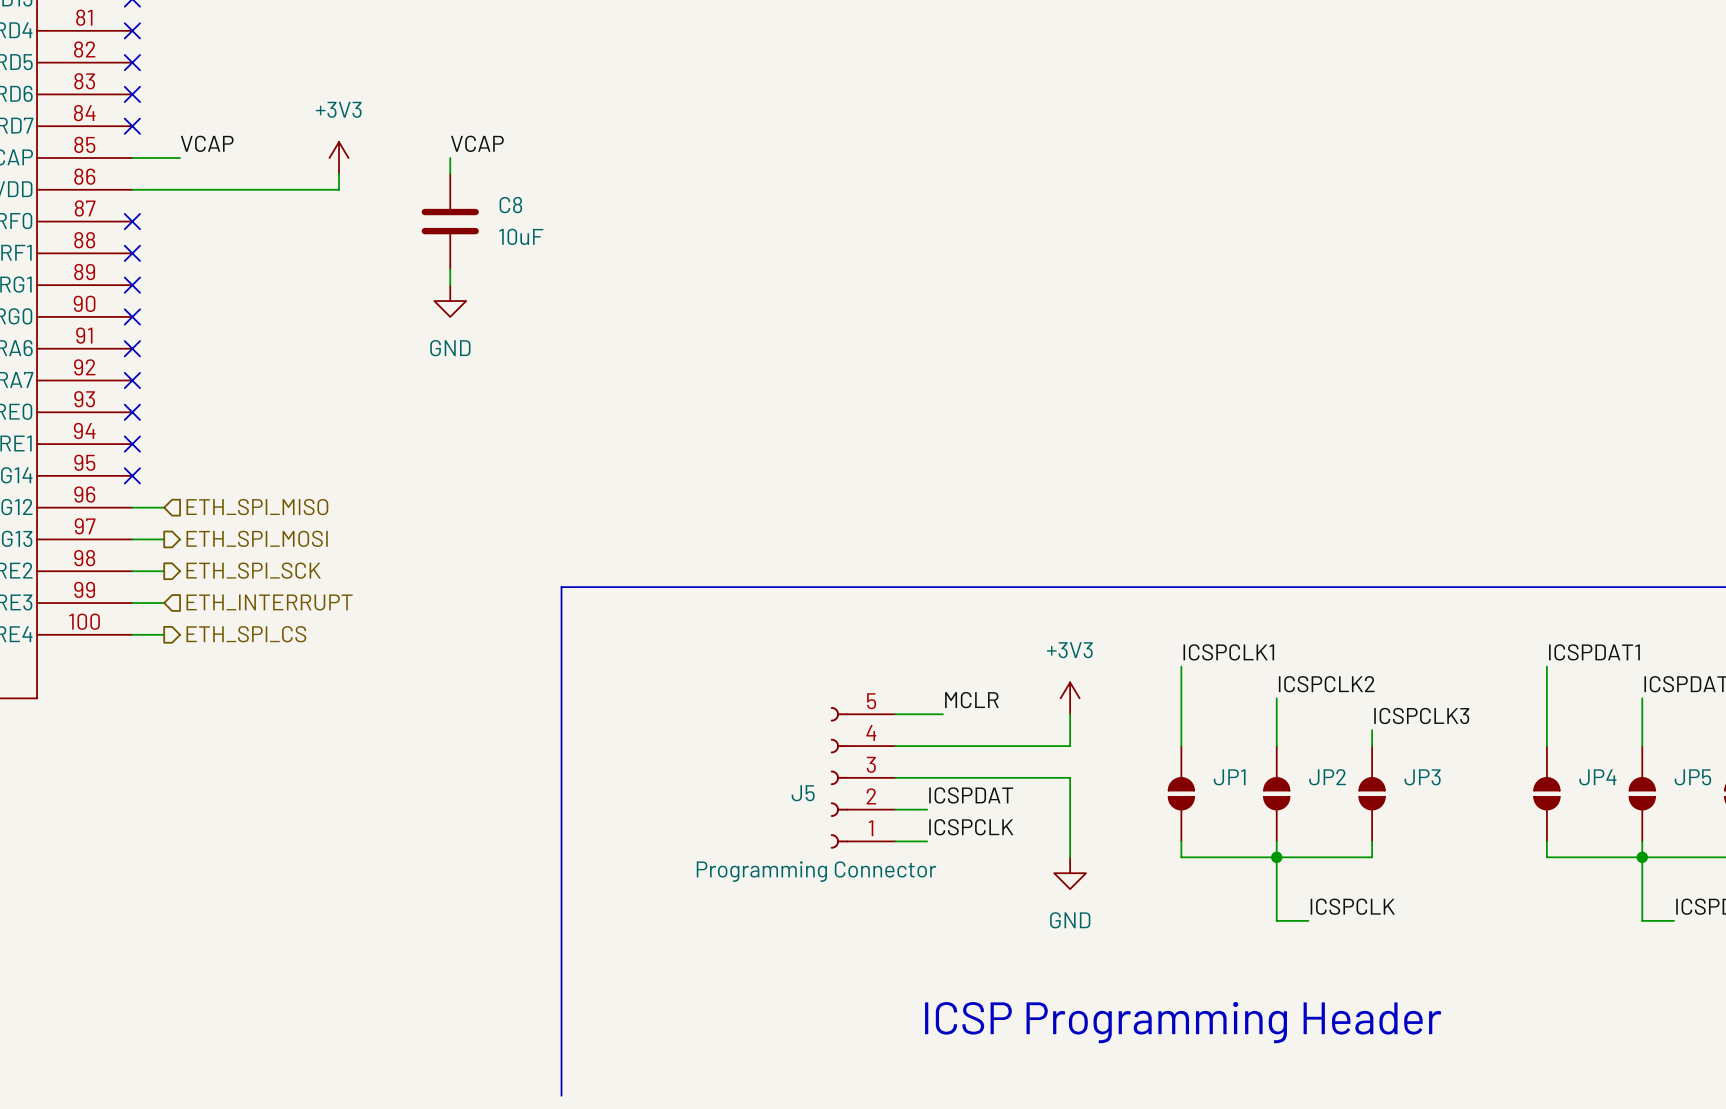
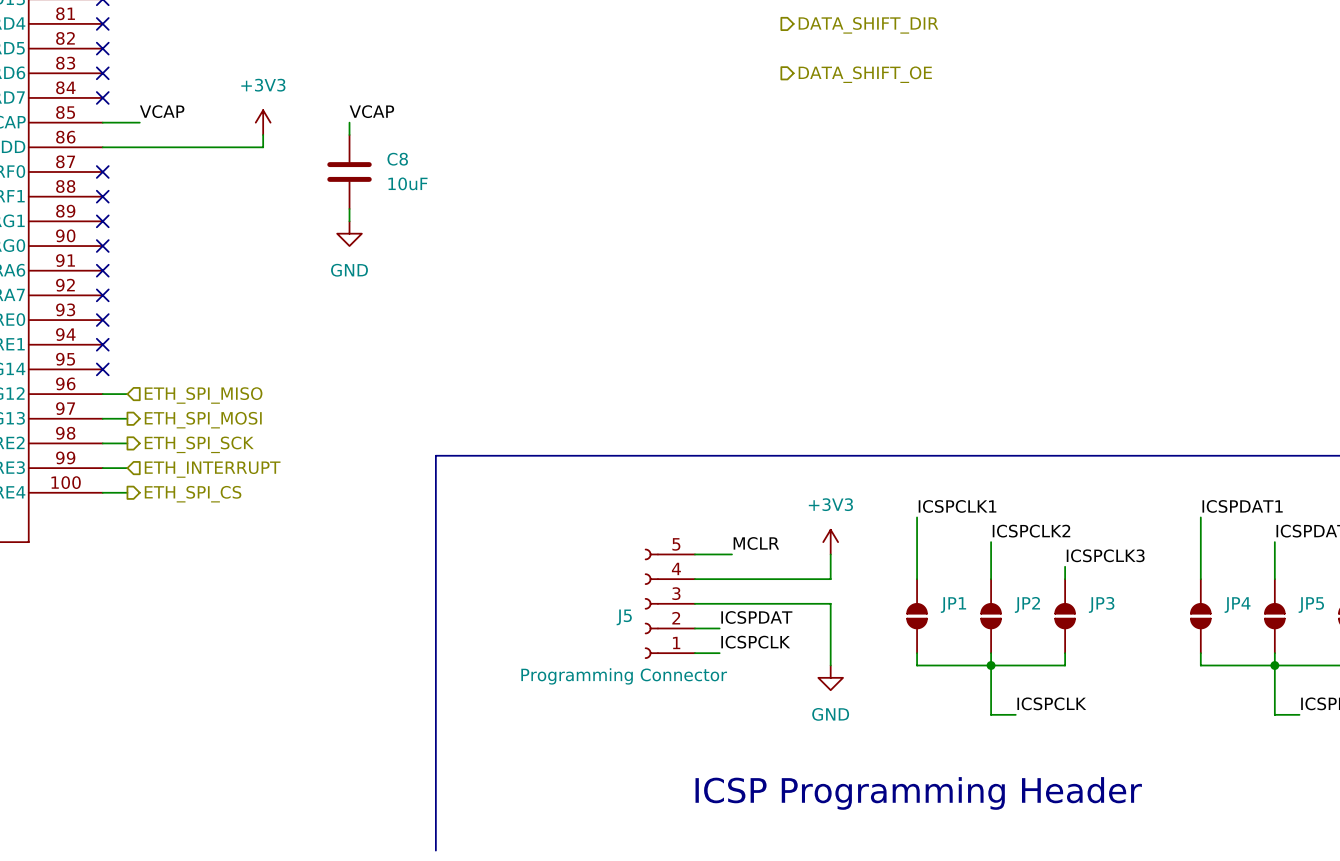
hierarchical label: none -> DATA_SHIFT_DIR (868, 25)
hierarchical label: none -> DATA_SHIFT_OE (865, 74)

